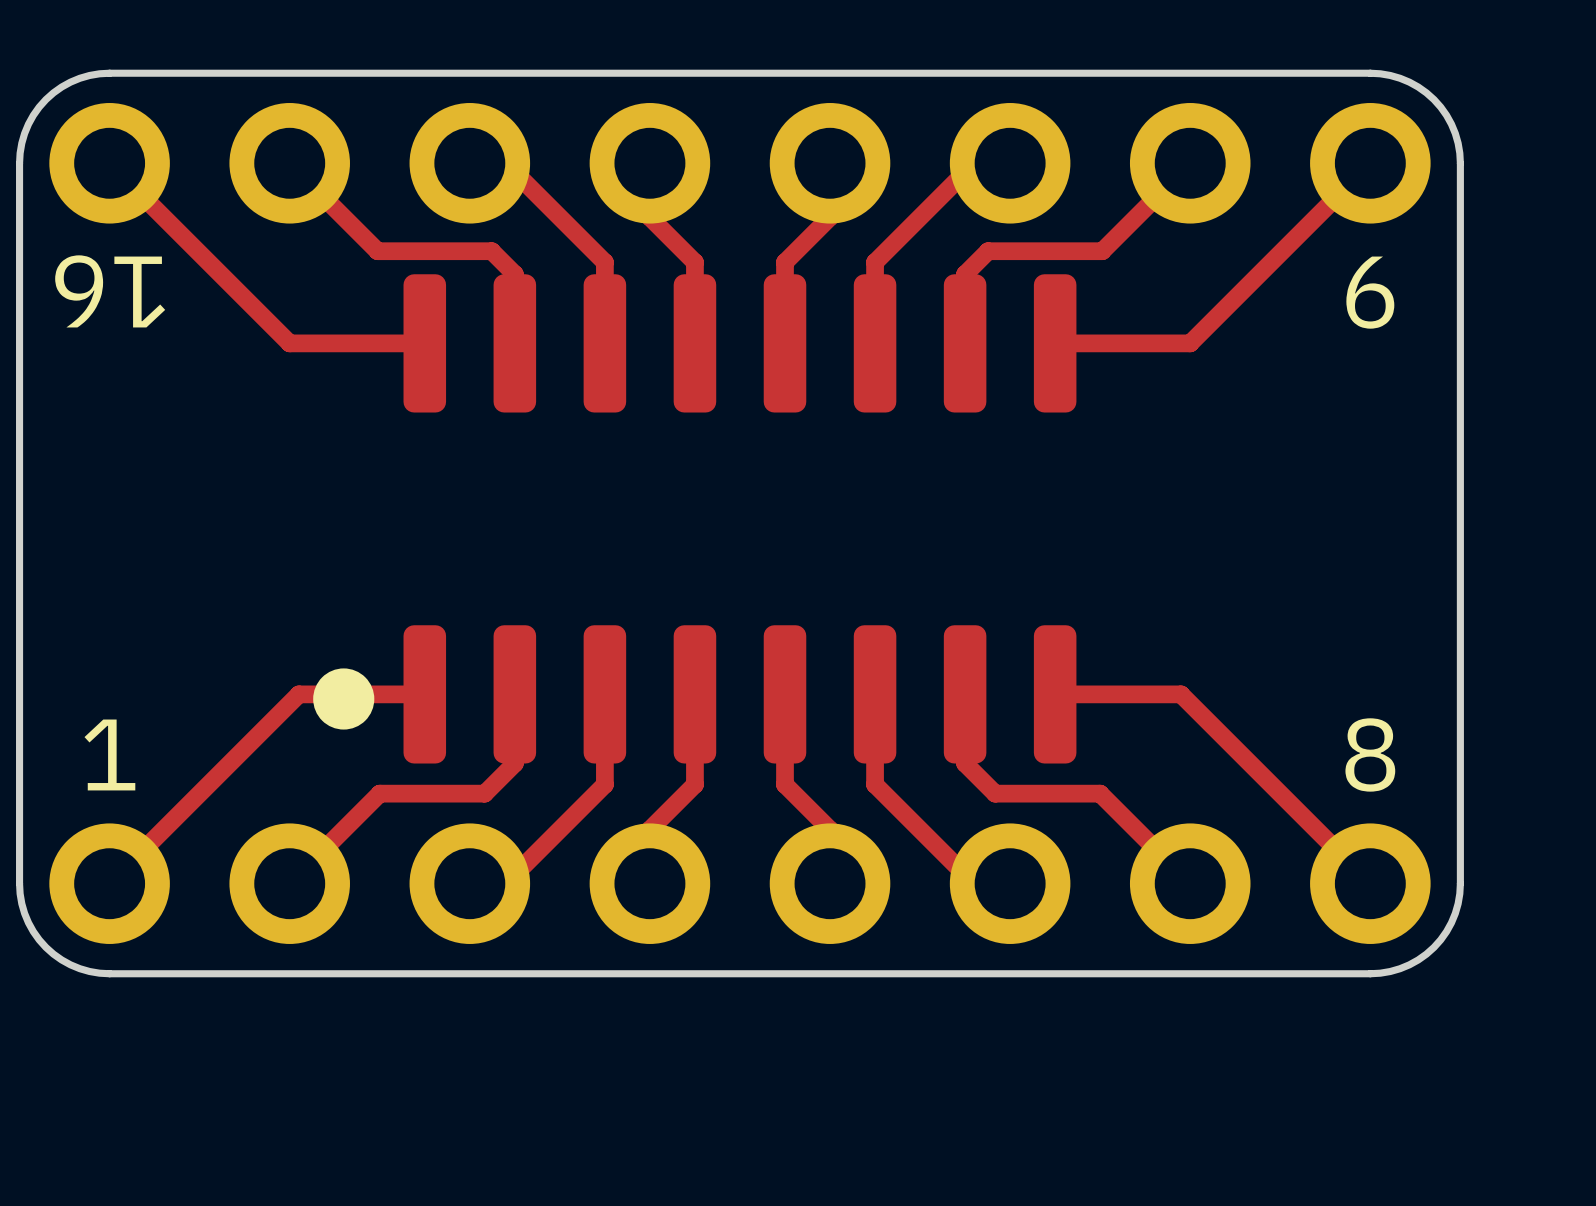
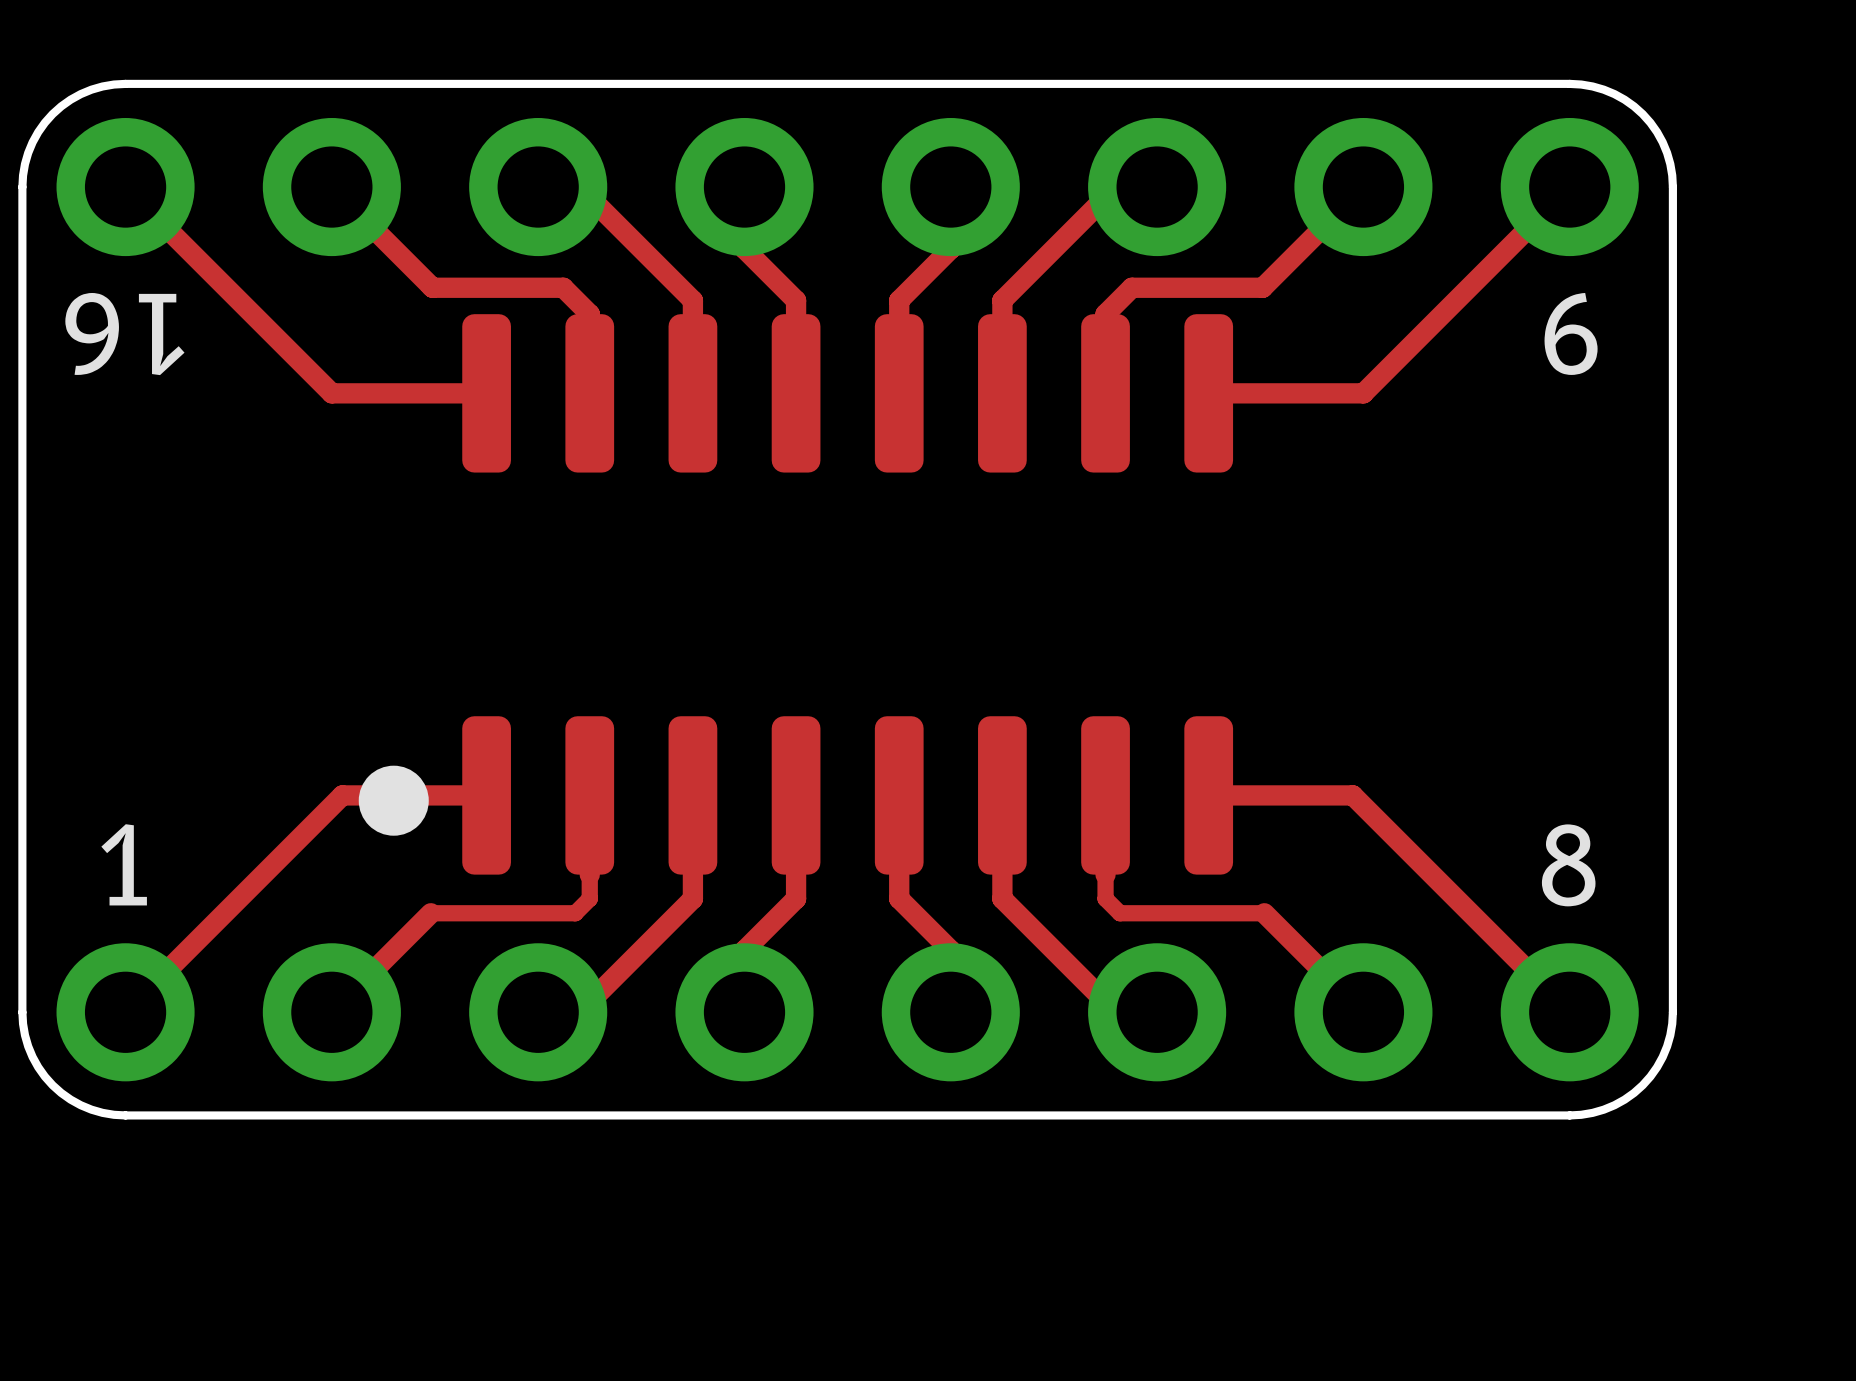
track: (514, 763) (484, 793) (379, 793) (376, 797) -> (589, 874) (589, 898) (575, 913) (430, 913)
track: (965, 763) (995, 793) (1100, 793) (1103, 797) -> (1105, 874) (1105, 898) (1119, 913) (1264, 913)

